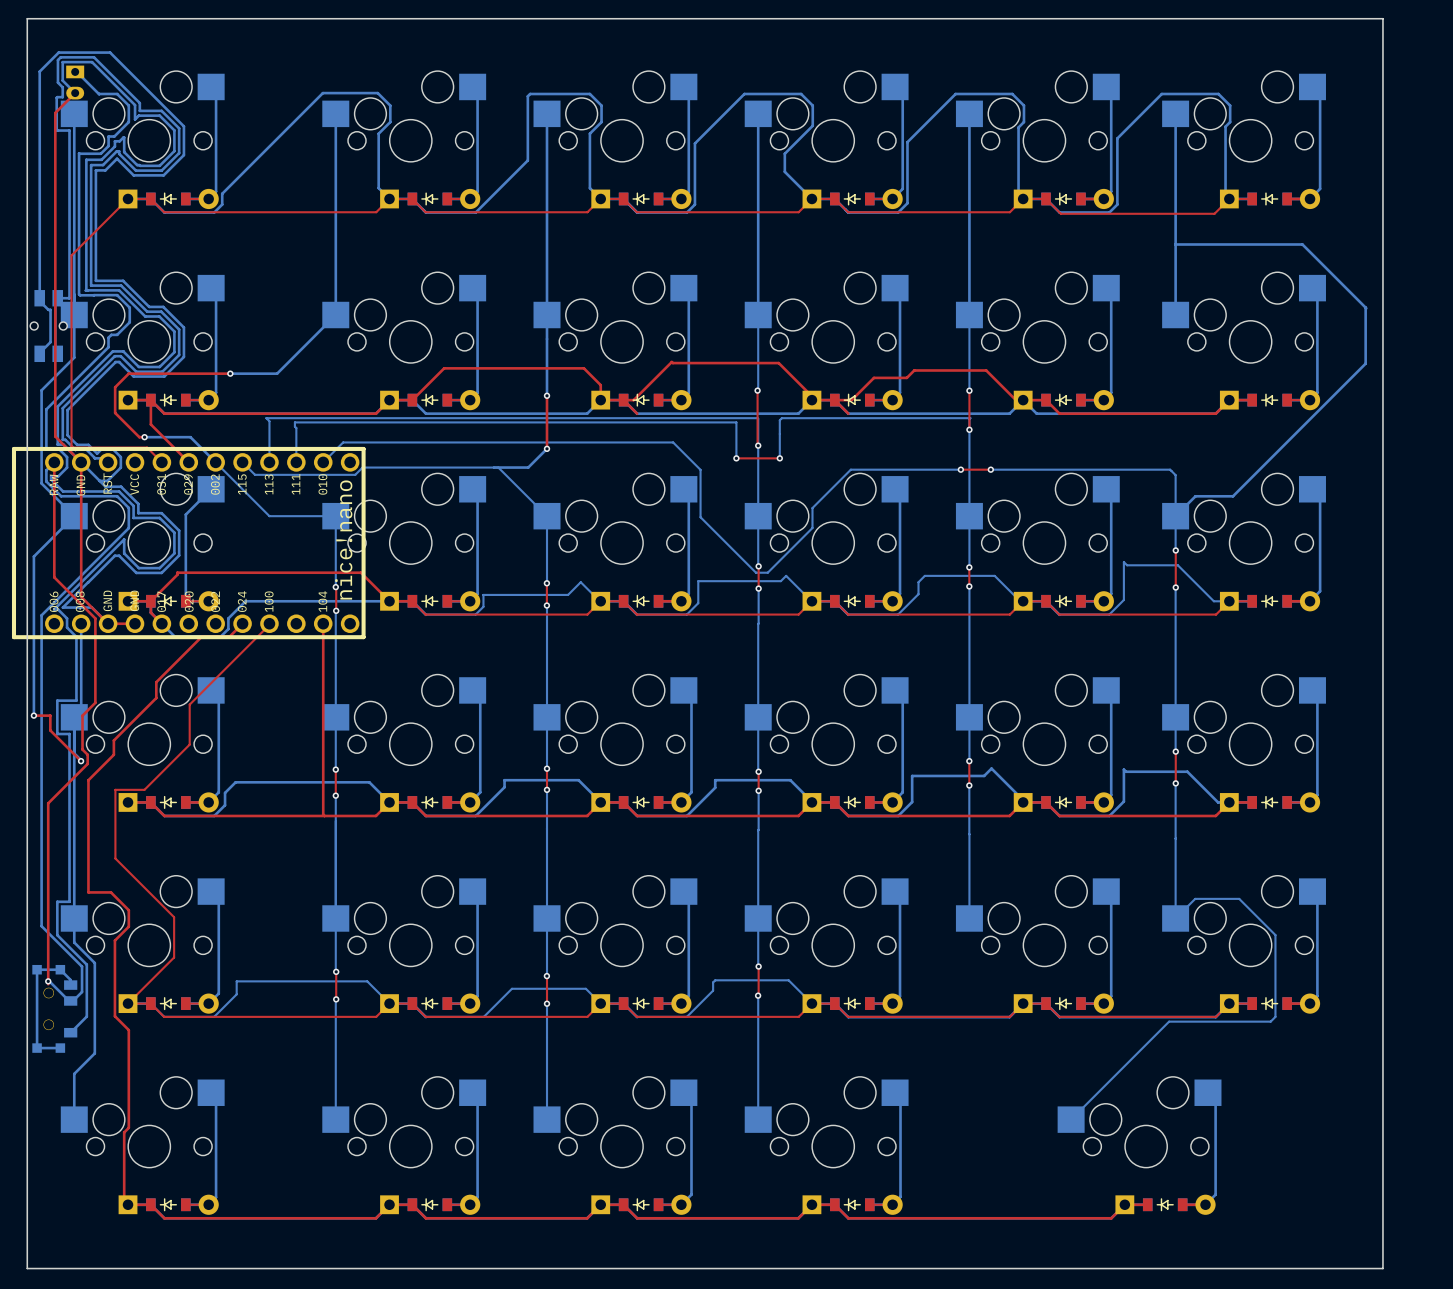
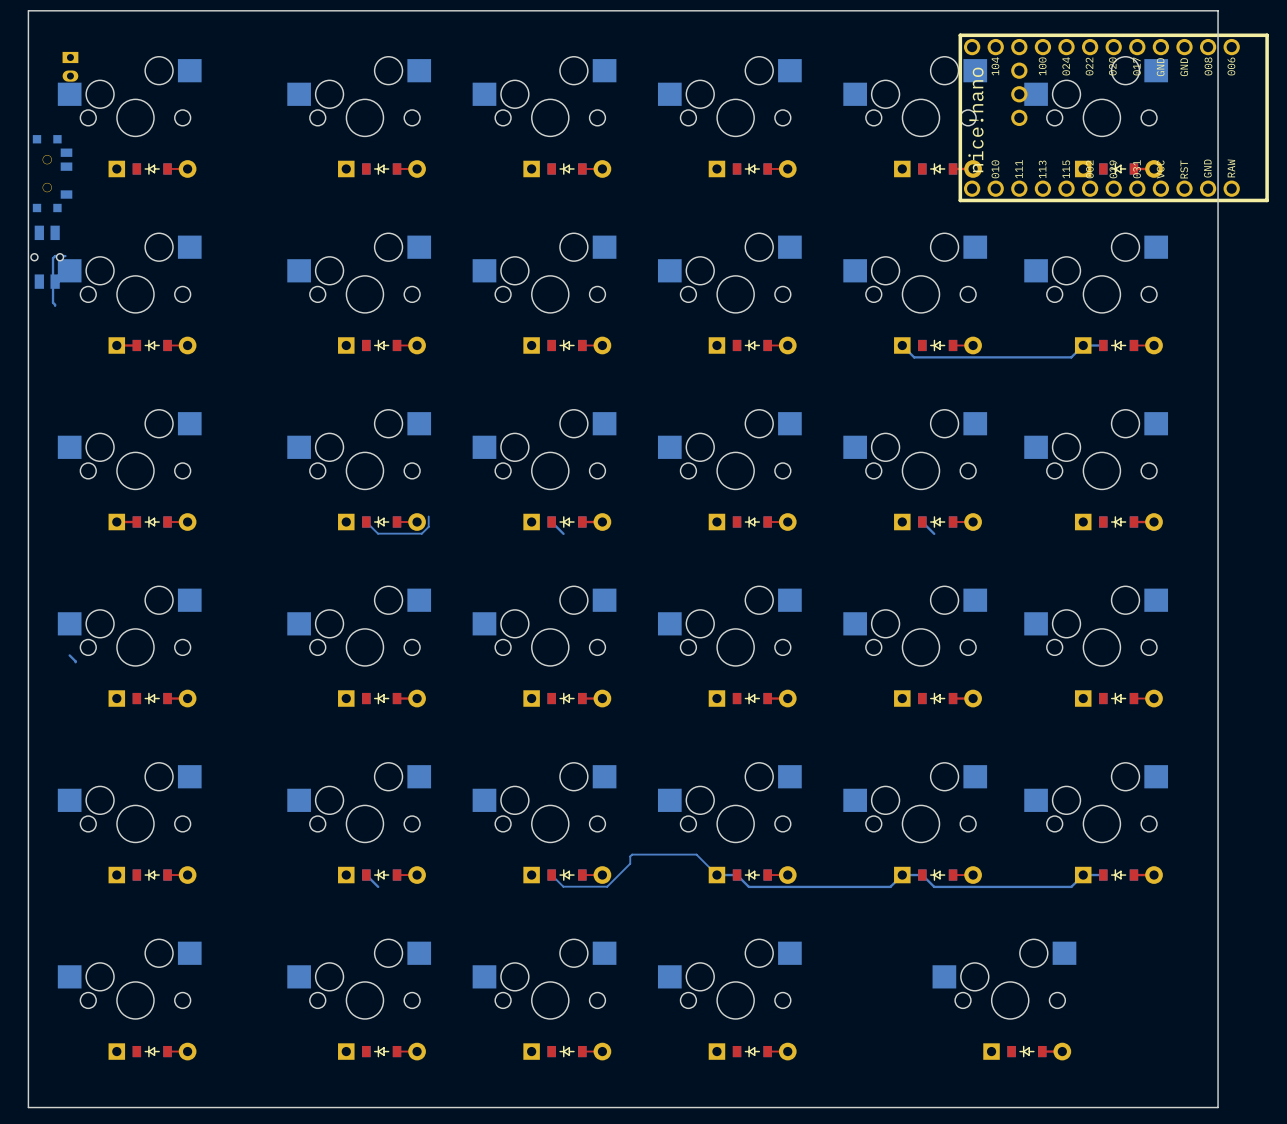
bottom track: (75, 71) (99, 94) (117, 93) (128, 105) (128, 122) (114, 136) (108, 136) (108, 146) (100, 153) (79, 153) (79, 294) (117, 295) (129, 307) (129, 322) (117, 334) (111, 334) (108, 337) (108, 347) (46, 409) (46, 449) (59, 449) (67, 457) (67, 467) (58, 476) (51, 476) (51, 479) (63, 491) (119, 491) (133, 505) (133, 517) (159, 517) (174, 532) (174, 553) (159, 568) (138, 568) (124, 553) (124, 539) (54, 609) (58, 609) (67, 618) (67, 627) (76, 636) (76, 700) (57, 700) (57, 734) (69, 734) (69, 901) -> none
bottom track: (211, 86) (216, 91) (216, 191) (208, 198) (185, 198) -> none
bottom track: (472, 86) (477, 91) (477, 191) (470, 198) (447, 198) -> none
bottom track: (683, 86) (688, 91) (688, 191) (681, 198) (658, 198) -> none
bottom track: (895, 86) (902, 94) (902, 188) (892, 198) (869, 198) -> none
bottom track: (1106, 86) (1111, 91) (1111, 191) (1103, 198) (1080, 198) -> none
bottom track: (1312, 86) (1320, 94) (1320, 188) (1310, 198) (1287, 198) -> none
bottom track: (75, 93) (62, 80) (62, 62) (92, 62) (135, 105) (135, 119) (138, 115) (159, 115) (174, 130) (174, 151) (159, 165) (137, 165) (124, 152) (124, 137) (119, 141) (114, 141) (114, 146) (101, 159) (86, 159) (85, 290) (119, 290) (145, 316) (159, 316) (174, 331) (174, 352) (159, 366) (138, 366) (123, 351) -> none
top track: (75, 93) (55, 112) (55, 436) (81, 462) (81, 596) (108, 623) (135, 623) -> none
bottom track: (74, 113) (74, 357) (41, 390) (41, 483) (74, 516) (33, 556) (33, 716) -> none
bottom track: (335, 113) (335, 315) (277, 373) (230, 373) -> none
bottom track: (547, 113) (547, 395) -> none
bottom track: (758, 113) (757, 390) -> none
bottom track: (969, 113) (969, 390) -> none
bottom track: (1175, 113) (1175, 315) -> none
part: none -> (1113, 117)
bottom track: (128, 198) (150, 198) (164, 212) (214, 212) (222, 204) (222, 193) (322, 93) (377, 93) (390, 105) (390, 122) (378, 133) (378, 188) (389, 198) (412, 198) (425, 212) (475, 212) (527, 160) (527, 96) (530, 93) (589, 93) (601, 105) (601, 122) (589, 133) (589, 188) (600, 198) (623, 198) (637, 212) (687, 212) (694, 204) (694, 143) (744, 93) (801, 93) (812, 105) (812, 125) (784, 153) (784, 171) (811, 198) (834, 198) (848, 212) (898, 212) (907, 203) (907, 142) (955, 93) (1012, 93) (1023, 105) (1023, 122) (1018, 127) (1018, 194) (1023, 198) (1046, 198) (1059, 212) (1109, 212) (1117, 204) (1117, 138) (1161, 93) (1218, 93) (1230, 105) (1230, 122) (1225, 126) (1225, 195) (1229, 198) (1252, 198) -> none
top track: (1252, 198) (1229, 198) (1214, 213) (1060, 213) (1046, 198) (1023, 198) (1009, 212) (848, 212) (834, 198) (811, 198) (798, 212) (636, 212) (623, 198) (600, 198) (587, 212) (425, 212) (412, 198) (389, 198) (376, 212) (164, 212) (150, 198) (128, 198) (71, 255) (71, 446) (147, 447) (161, 462) -> none
part: none -> (52, 173)
bottom track: (1175, 244) (1302, 244) (1366, 308) -> none
bottom track: (211, 288) (216, 293) (216, 392) (208, 400) (185, 400) -> none
bottom track: (472, 288) (477, 293) (477, 392) (470, 400) (447, 400) -> none
bottom track: (683, 288) (688, 293) (688, 392) (681, 400) (658, 400) -> none
bottom track: (895, 288) (900, 293) (900, 392) (892, 400) (869, 400) -> none
bottom track: (1106, 288) (1111, 293) (1111, 392) (1103, 400) (1080, 400) -> none
bottom track: (1312, 288) (1317, 293) (1317, 392) (1310, 400) (1287, 400) -> none
bottom track: (69, 298) (69, 130) (56, 129) (56, 97) (62, 97) (62, 87) (57, 82) (57, 60) (60, 57) (94, 57) (139, 103) (139, 110) (161, 110) (179, 128) (179, 153) (161, 170) (135, 170) (119, 153) (119, 151) (116, 151) (103, 165) (91, 165) (91, 285) (121, 285) (147, 311) (161, 311) (179, 329) (179, 354) (162, 371) (136, 371) (120, 356) (114, 356) (62, 408) (62, 439) (65, 439) (75, 450) (86, 449) (94, 458) (104, 458) (108, 462) -> none
bottom track: (1365, 307) (1365, 363) (1232, 496) (1195, 496) (1175, 516) -> none
part position: (48, 326) -> (47, 257)
bottom track: (123, 351) (112, 351) (57, 406) (57, 444) -> none
bottom track: (39, 353) (50, 342) (50, 309) (39, 301) (39, 71) (58, 52) (110, 52) (183, 126) (183, 155) (163, 175) (133, 175) (117, 158) (105, 170) (95, 170) (95, 280) (123, 280) (149, 306) (163, 306) (183, 327) (183, 356) (164, 376) (133, 376) (119, 362) (115, 362) (67, 410) (67, 435) (77, 444) (88, 444) (97, 453) (101, 449) (113, 449) (120, 457) (120, 467) (107, 480) (99, 480) -> none
top track: (230, 373) (128, 373) (115, 387) (115, 412) (139, 437) (144, 437) -> none
via: (230, 373) -> none
top track: (757, 390) (758, 445) -> none
via: (757, 390) -> none
top track: (969, 390) (969, 429) -> none
via: (969, 390) -> none
top track: (547, 395) (547, 449) -> none
via: (547, 395) -> none
bottom track: (128, 400) (150, 400) (164, 413) (375, 413) (389, 400) (412, 400) (425, 413) (587, 413) (600, 400) (623, 400) (637, 413) (798, 413) (811, 400) (834, 400) (848, 413) (1009, 413) (1023, 400) (1046, 400) -> none
top track: (623, 400) (637, 413) -> none
top track: (834, 400) (848, 413) -> none
top track: (1252, 400) (1229, 400) (1215, 413) (1059, 413) (1046, 400) (1015, 400) (986, 370) (914, 370) (906, 377) (873, 377) (851, 400) (811, 400) (811, 396) (778, 363) (671, 362) (633, 400) (600, 400) (600, 385) (583, 368) (444, 368) (412, 400) (389, 400) (375, 413) (164, 413) (150, 400) (150, 424) (188, 462) -> none
via: (969, 429) -> none
bottom track: (144, 437) (190, 437) (269, 516) (335, 516) (335, 587) -> none
via: (144, 437) -> none
bottom track: (57, 444) (63, 444) (105, 486) (121, 486) (138, 503) (138, 513) (161, 513) (179, 530) (179, 555) (161, 572) (136, 572) (119, 555) (114, 555) (62, 607) (91, 607) (108, 623) -> none
via: (758, 445) -> none
bottom track: (547, 448) (528, 467) (493, 467) -> none
via: (547, 448) -> none
bottom track: (736, 458) (736, 422) (294, 422) (296, 462) -> none
top track: (736, 458) (779, 458) -> none
via: (736, 458) -> none
bottom track: (779, 458) (779, 420) (781, 418) (970, 418) (969, 567) -> none
via: (779, 458) -> none
bottom track: (54, 462) (46, 470) (46, 481) (61, 496) (117, 496) (128, 507) (128, 528) (41, 615) (41, 926) (82, 966) (82, 992) (73, 1000) (69, 1000) (48, 981) -> none
top track: (54, 462) (54, 577) (95, 618) (95, 702) (82, 715) (82, 749) (87, 754) (87, 763) (48, 803) (48, 984) -> none
bottom track: (242, 462) (255, 474) (355, 474) (362, 467) (498, 467) (547, 516) (547, 583) -> none
bottom track: (269, 462) (269, 421) (266, 418) (757, 418) (758, 566) -> none
bottom track: (323, 462) (343, 442) (673, 442) (700, 469) (700, 517) (756, 572) (767, 572) (812, 528) (812, 508) (850, 469) (960, 469) -> none
top track: (959, 469) (990, 469) -> none
via: (960, 469) -> none
via: (990, 469) -> none
bottom track: (989, 471) (1170, 469) (1175, 475) (1175, 550) -> none
bottom track: (211, 489) (185, 514) (185, 601) (208, 601) -> none
bottom track: (472, 489) (477, 494) (477, 593) (470, 601) (447, 601) -> none
bottom track: (683, 489) (688, 494) (688, 593) (681, 601) (658, 601) -> none
bottom track: (895, 489) (900, 494) (900, 593) (892, 601) (869, 601) -> none
bottom track: (1106, 489) (1111, 494) (1111, 593) (1103, 601) (1080, 601) -> none
bottom track: (1312, 489) (1320, 496) (1320, 591) (1310, 601) (1287, 601) -> none
part: (188, 543) -> none
top track: (1176, 549) (1175, 587) -> none
via: (1175, 550) -> none
top track: (758, 566) (758, 588) -> none
via: (758, 566) -> none
top track: (969, 566) (969, 586) -> none
via: (969, 567) -> none
top track: (546, 583) (546, 605) -> none
via: (546, 583) -> none
bottom track: (969, 586) (969, 761) -> none
via: (969, 586) -> none
top track: (335, 587) (336, 610) -> none
via: (335, 587) -> none
bottom track: (1175, 587) (1175, 751) -> none
via: (1175, 587) -> none
bottom track: (758, 588) (758, 771) -> none
via: (758, 588) -> none
bottom track: (483, 594) (568, 594) (580, 582) (599, 601) (623, 601) (636, 614) (686, 614) (698, 603) (698, 581) (780, 581) (786, 575) (811, 601) (834, 601) -> none
bottom track: (128, 601) (150, 601) (150, 612) (174, 636) (220, 636) (228, 629) (228, 618) (245, 601) (412, 601) (425, 614) -> none
bottom track: (834, 601) (848, 614) (898, 614) (918, 594) (918, 582) (924, 575) (994, 575) (1020, 601) (1046, 601) (1059, 614) (1109, 614) (1123, 600) (1123, 562) (1127, 565) (1177, 565) (1213, 601) (1252, 601) -> none
top track: (1252, 601) (1229, 601) (1216, 614) (1059, 614) (1046, 601) (1023, 601) (1009, 614) (848, 614) (834, 601) (811, 601) (798, 614) (636, 614) (623, 601) (600, 601) (587, 614) (425, 614) (412, 601) (389, 601) (360, 572) (177, 572) (150, 601) (150, 612) (161, 623) -> none
via: (546, 605) -> none
bottom track: (547, 605) (547, 768) -> none
bottom track: (336, 610) (336, 770) -> none
via: (336, 610) -> none
bottom track: (81, 623) (81, 709) (74, 716) (74, 942) (94, 963) (94, 1053) (74, 1073) (74, 1119) (80, 1113) -> none
top track: (242, 623) (229, 636) (202, 636) (156, 682) (156, 698) (113, 740) (113, 754) (88, 780) (88, 892) (111, 892) (128, 910) (128, 926) (114, 940) (114, 1016) (128, 1030) (128, 1127) (124, 1132) (124, 1200) (128, 1204) (150, 1204) (164, 1218) (375, 1218) (389, 1204) (412, 1204) (425, 1218) (587, 1218) (600, 1204) (623, 1204) (637, 1218) (798, 1218) (811, 1204) (834, 1204) (848, 1218) (1111, 1218) (1124, 1204) (1147, 1204) -> none
top track: (269, 623) (189, 704) (189, 744) (144, 789) (115, 789) (115, 858) (174, 917) (174, 957) (128, 1003) (150, 1003) (164, 1016) (376, 1016) (389, 1003) (412, 1003) (425, 1016) (587, 1016) (600, 1003) (623, 1003) (636, 1016) (798, 1016) (811, 1003) (834, 1003) (848, 1016) (1009, 1016) (1023, 1003) (1046, 1003) (1059, 1016) (1216, 1016) (1229, 1003) (1252, 1003) -> none
top track: (323, 623) (324, 815) -> none
bottom track: (211, 690) (218, 698) (218, 792) (208, 802) (185, 802) -> none
bottom track: (472, 690) (480, 698) (480, 792) (470, 802) (447, 802) -> none
bottom track: (683, 690) (691, 698) (691, 792) (681, 802) (658, 802) -> none
bottom track: (895, 690) (902, 698) (902, 792) (892, 802) (869, 802) -> none
bottom track: (1106, 690) (1111, 695) (1111, 795) (1103, 802) (1080, 802) -> none
bottom track: (1312, 690) (1317, 695) (1317, 795) (1310, 802) (1287, 802) -> none
top track: (33, 715) (50, 715) (50, 730) (81, 761) -> none
via: (33, 715) -> none
top track: (1175, 751) (1175, 783) -> none
via: (1175, 751) -> none
via: (81, 761) -> none
top track: (969, 761) (969, 785) -> none
via: (969, 761) -> none
top track: (547, 768) (547, 789) -> none
via: (547, 768) -> none
top track: (335, 769) (336, 796) -> none
via: (335, 769) -> none
top track: (758, 771) (758, 790) -> none
via: (758, 771) -> none
bottom track: (1175, 783) (1175, 918) (1195, 898) (1239, 898) (1275, 935) (1275, 1016) (1270, 1021) (1169, 1021) (1071, 1119) -> none
via: (1175, 783) -> none
bottom track: (969, 785) (969, 834) -> none
via: (969, 785) -> none
bottom track: (547, 789) (547, 975) -> none
via: (547, 789) -> none
bottom track: (758, 790) (758, 966) -> none
via: (758, 790) -> none
bottom track: (335, 795) (336, 971) -> none
via: (335, 795) -> none
top track: (128, 802) (150, 802) (164, 815) (375, 815) (389, 802) (412, 802) (425, 815) (587, 815) (600, 802) (623, 802) (637, 815) (798, 815) (811, 802) (834, 802) (848, 815) (1009, 815) (1023, 802) (1046, 802) (1059, 815) (1215, 815) (1229, 802) (1252, 802) -> none
bottom track: (600, 802) (578, 780) (504, 780) (504, 787) (475, 815) (425, 815) (412, 802) (389, 802) (369, 782) (235, 782) (225, 792) (225, 805) (214, 815) (164, 815) (150, 802) (128, 802) -> none
bottom track: (600, 802) (623, 802) (637, 815) (687, 815) (715, 787) (715, 780) (790, 780) (811, 802) (834, 802) (848, 815) (898, 815) (912, 802) (912, 775) (984, 775) (991, 768) (1023, 800) (1023, 802) (1046, 802) (1059, 815) (1109, 815) (1123, 801) (1123, 769) (1126, 771) (1187, 771) (1218, 802) (1252, 802) -> none
bottom track: (969, 834) (969, 918) -> none
bottom track: (211, 891) (218, 899) (218, 993) (208, 1003) (185, 1003) -> none
bottom track: (472, 891) (477, 896) (477, 996) (470, 1003) (447, 1003) -> none
bottom track: (683, 891) (688, 896) (688, 996) (681, 1003) (658, 1003) -> none
bottom track: (895, 891) (900, 896) (900, 996) (892, 1003) (869, 1003) -> none
bottom track: (1106, 891) (1111, 896) (1111, 996) (1103, 1003) (1080, 1003) -> none
bottom track: (1312, 891) (1317, 896) (1317, 996) (1310, 1003) (1287, 1003) -> none
bottom track: (69, 901) (57, 901) (57, 935) (86, 964) (86, 1016) (70, 1032) -> none
top track: (758, 966) (758, 995) -> none
via: (758, 966) -> none
top track: (336, 971) (336, 999) -> none
via: (336, 971) -> none
via: (546, 976) -> none
top track: (547, 976) (547, 1003) -> none
via: (48, 981) -> none
bottom track: (70, 985) (70, 980) (60, 969) (37, 969) (37, 1048) (60, 1048) -> none
bottom track: (757, 995) (758, 1119) -> none
via: (758, 995) -> none
bottom track: (336, 999) (335, 1119) -> none
via: (336, 999) -> none
bottom track: (128, 1003) (150, 1003) (164, 1016) (214, 1016) (236, 994) (236, 981) (367, 981) (389, 1003) (412, 1003) (425, 1016) (483, 1016) (511, 988) (585, 988) (600, 1003) (623, 1003) (637, 1017) -> none
bottom track: (547, 1003) (547, 1119) -> none
via: (547, 1003) -> none
part: (54, 1008) -> none
bottom track: (211, 1092) (216, 1097) (216, 1197) (208, 1204) (185, 1204) -> none
bottom track: (472, 1092) (477, 1097) (477, 1197) (470, 1204) (447, 1204) -> none
bottom track: (683, 1092) (691, 1100) (691, 1194) (681, 1204) (658, 1204) -> none
bottom track: (895, 1092) (900, 1098) (900, 1196) (892, 1204) (869, 1204) -> none
bottom track: (1207, 1092) (1215, 1100) (1215, 1194) (1205, 1204) (1182, 1204) -> none

